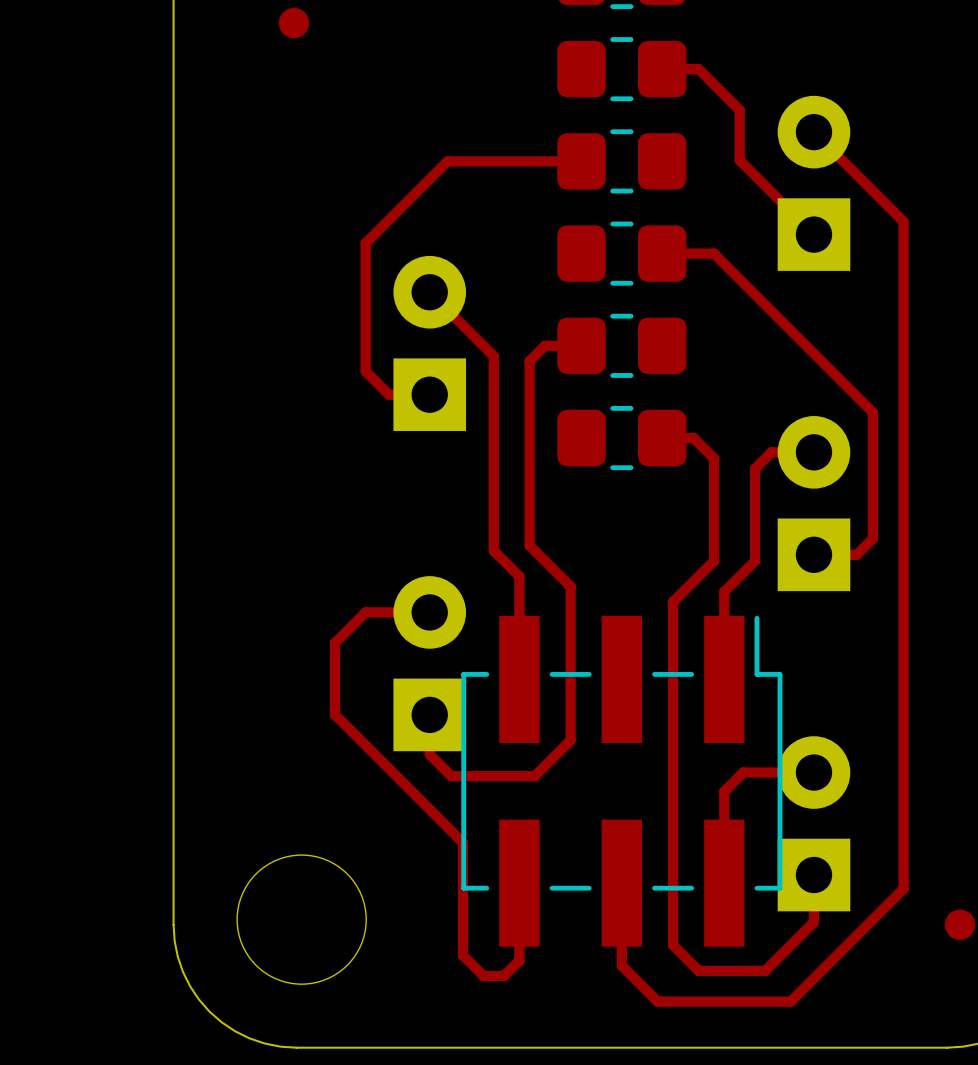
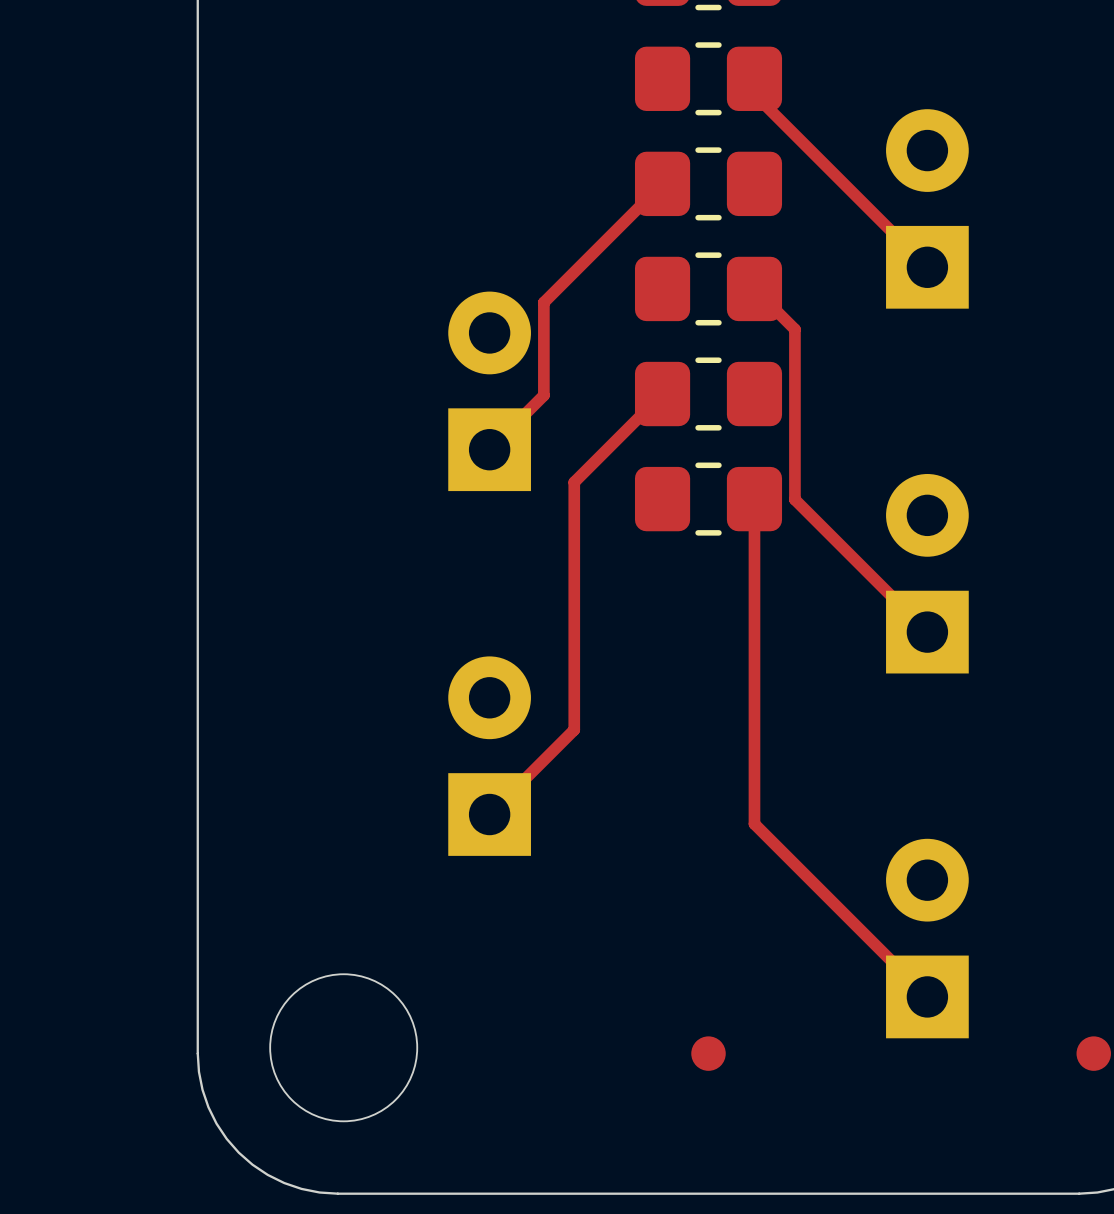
part position: (293, 23) -> (708, 1053)
track: (662, 69) (698, 69) (739, 110) (739, 160) -> (754, 78) (754, 94) (842, 182)
track: (813, 132) (903, 221) (903, 888) (790, 1001) (657, 1001) (621, 965) (621, 883) -> none
track: (581, 161) (447, 161) (365, 243) (365, 371) (388, 394) (429, 394) -> (662, 183) (543, 302) (543, 395) (489, 449)
track: (662, 253) (714, 253) (872, 412) (872, 538) (856, 554) (813, 554) -> (754, 288) (794, 329) (794, 499) (927, 632)
track: (429, 292) (493, 356) (493, 550) (519, 576) (519, 679) -> none
track: (581, 345) (545, 345) (529, 361) (529, 545) (570, 586) (570, 740) (534, 776) (451, 776) (429, 754) (429, 714) -> (662, 394) (574, 482) (574, 729) (489, 814)
track: (662, 438) (693, 438) (714, 458) (714, 561) (673, 601) (673, 945) (698, 970) (765, 970) (813, 922) (813, 874) -> (754, 499) (754, 823) (927, 996)
track: (813, 452) (771, 452) (755, 468) (755, 561) (724, 591) (724, 679) -> none
track: (429, 612) (365, 612) (334, 642) (334, 714) (463, 842) (463, 955) (483, 975) (504, 975) (519, 960) (519, 883) -> none
track: (813, 772) (743, 772) (724, 791) (724, 883) -> none
part: (621, 781) -> none

